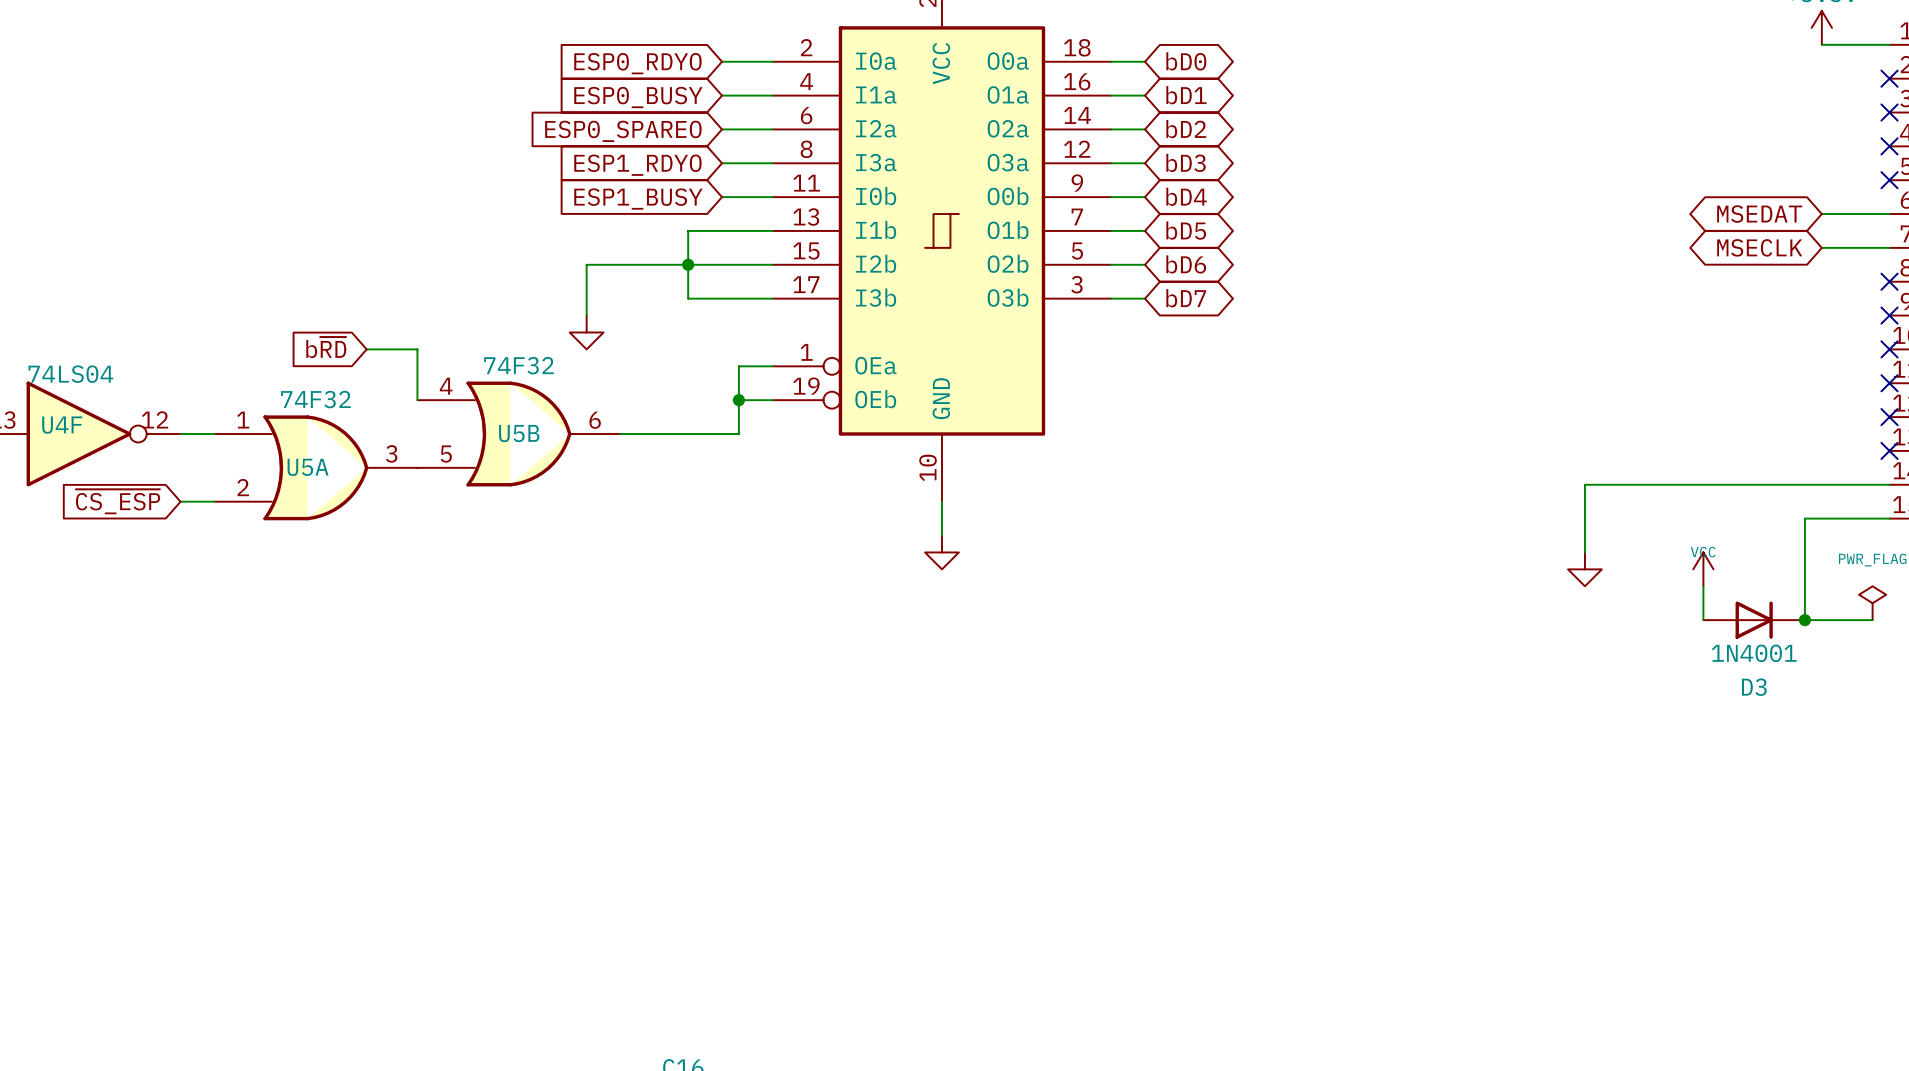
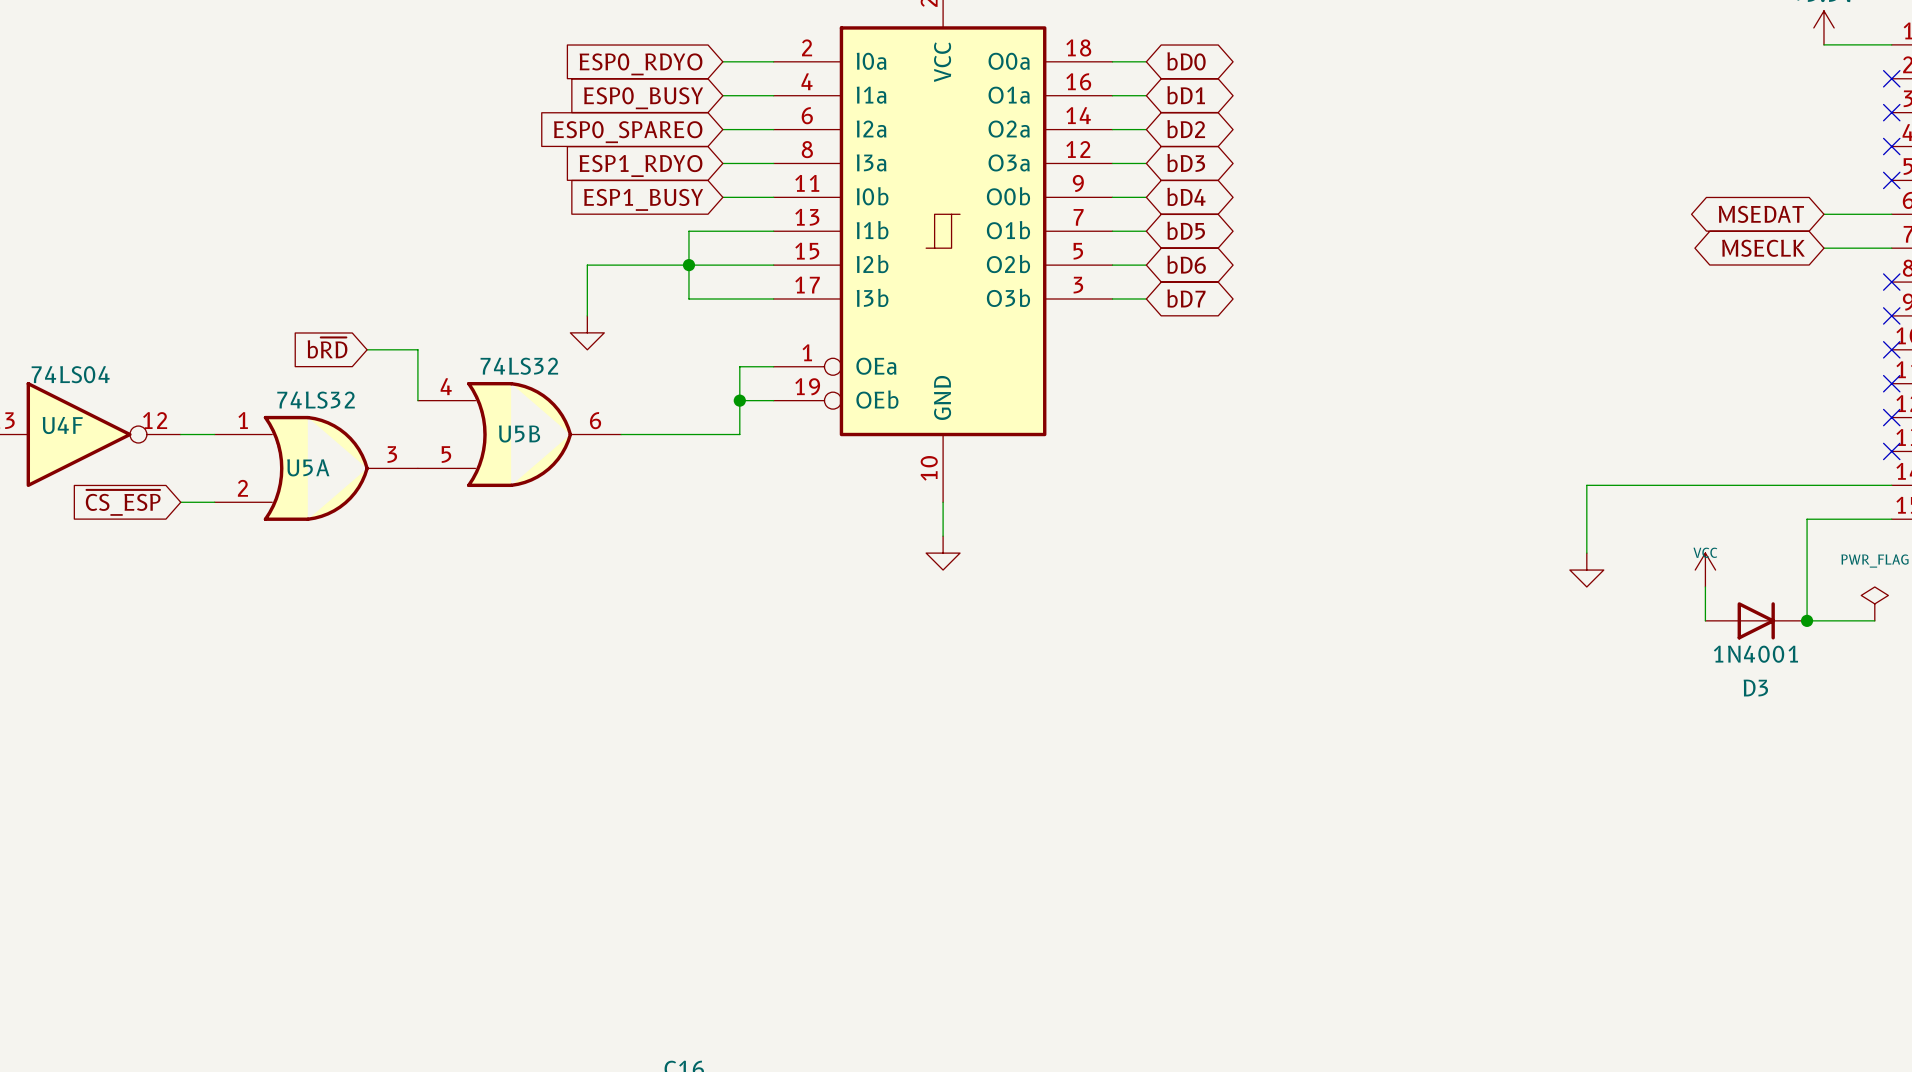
U5B value: 74F32 (518, 365) -> 74LS32 (519, 366)
U5A value: 74F32 (315, 399) -> 74LS32 (316, 400)

